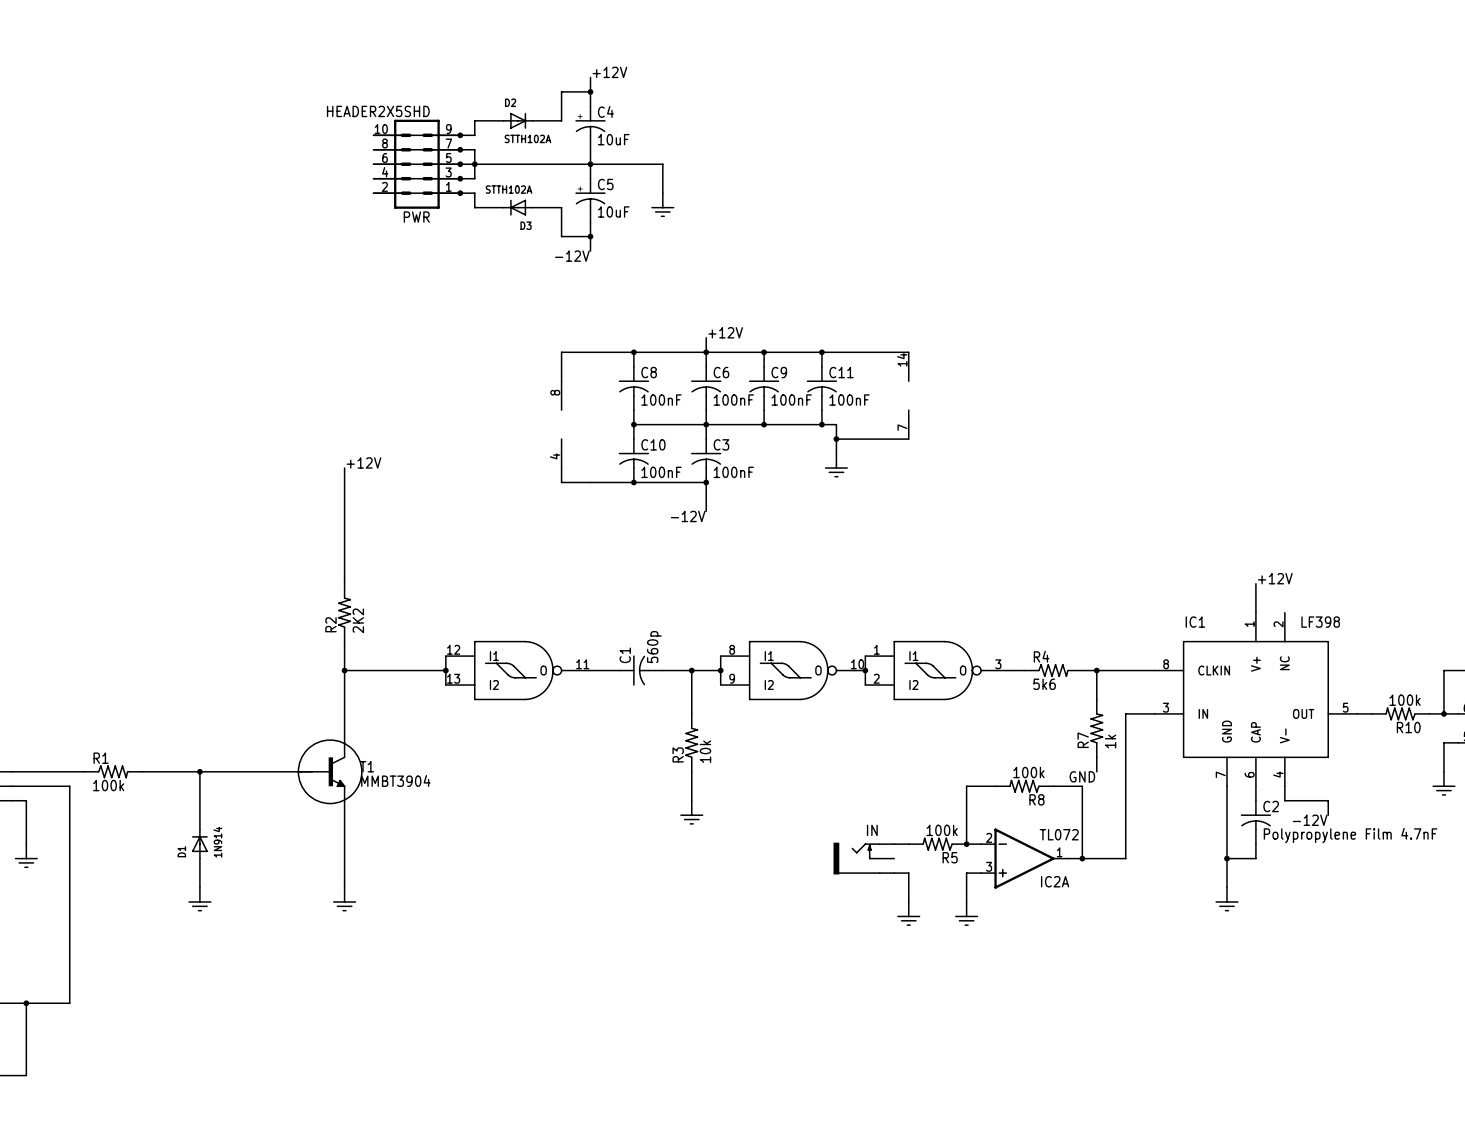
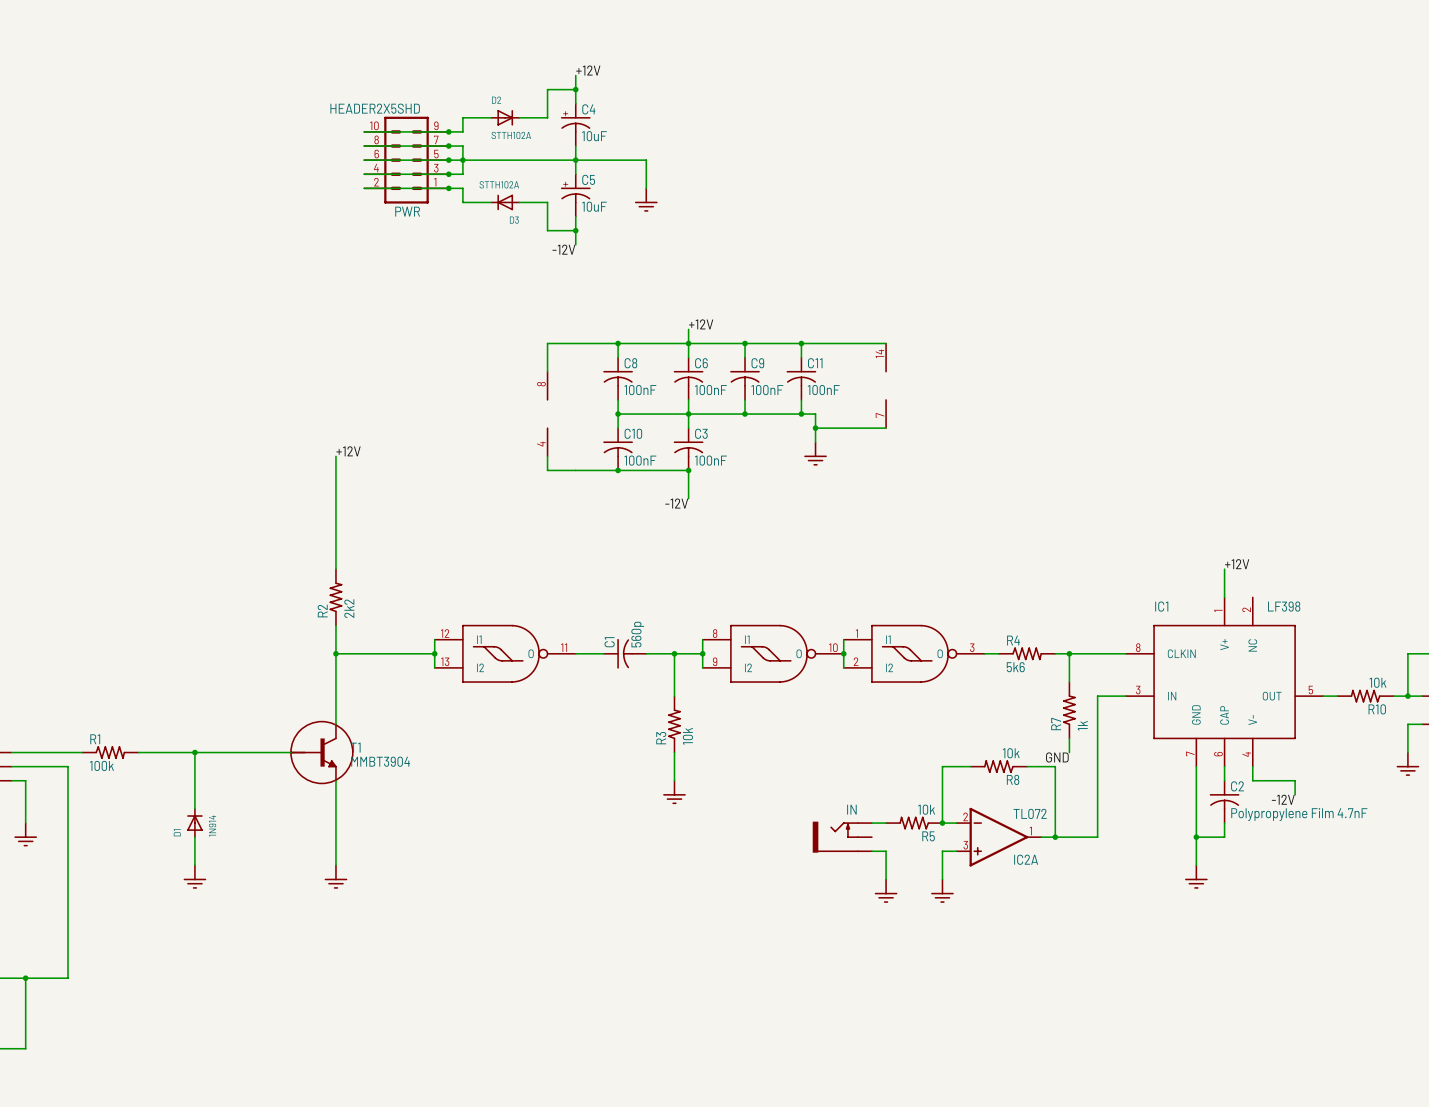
R2 value: 2K2 (358, 620) -> 2k2 (349, 608)
R10 value: 100k (1405, 700) -> 10k (1377, 682)
R8 value: 100k (1028, 772) -> 10k (1011, 753)
R5 value: 100k (942, 830) -> 10k (926, 809)

